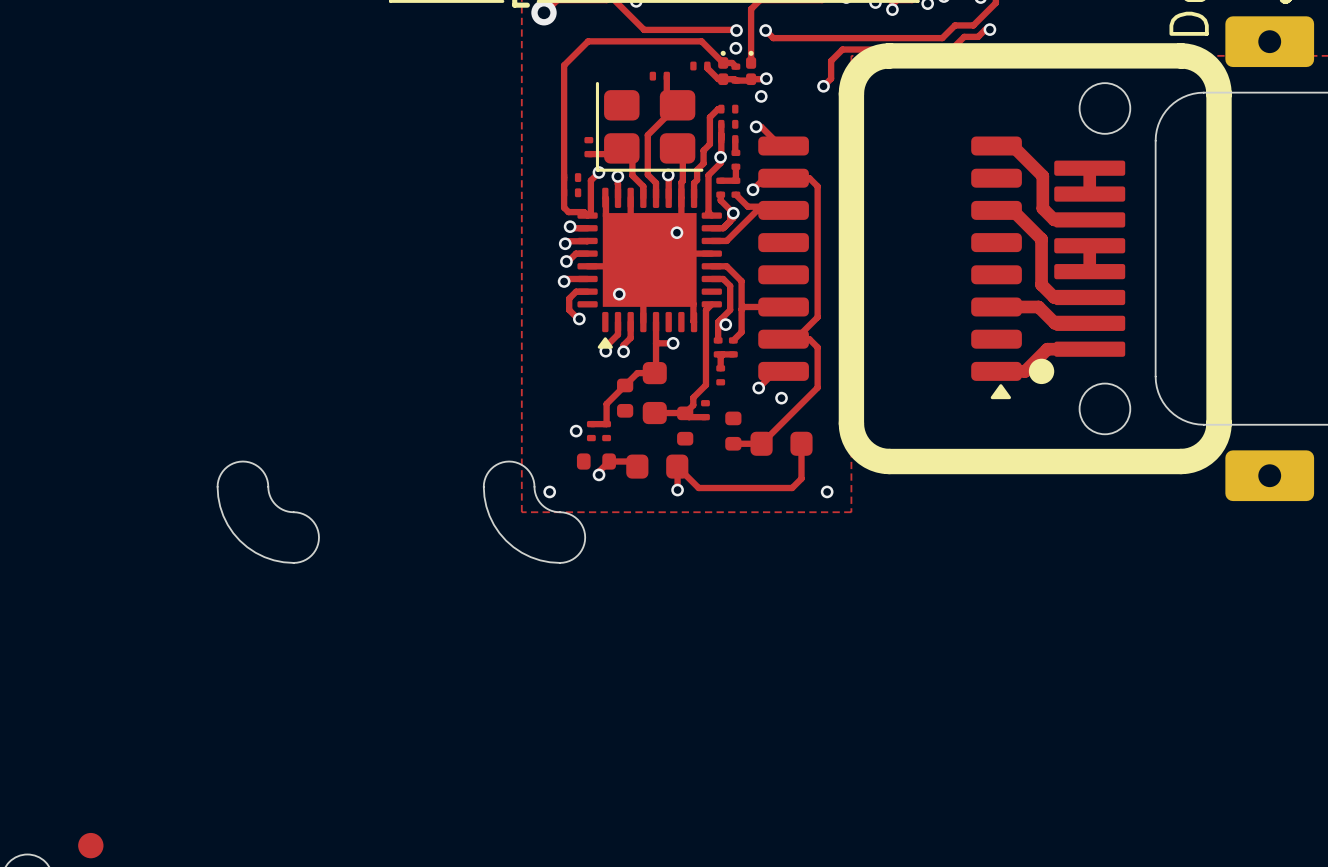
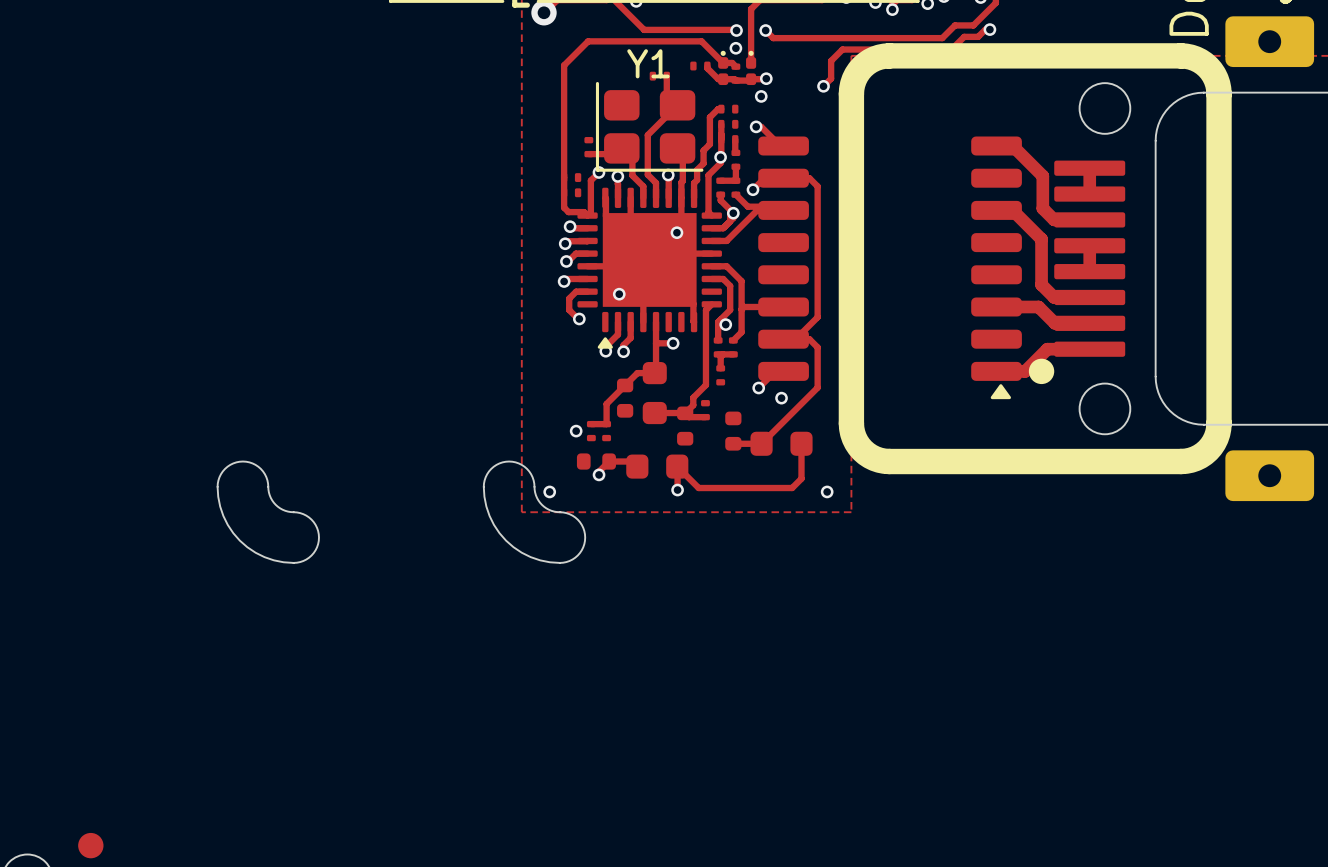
Y1 name: none -> Y1 (648, 63)

